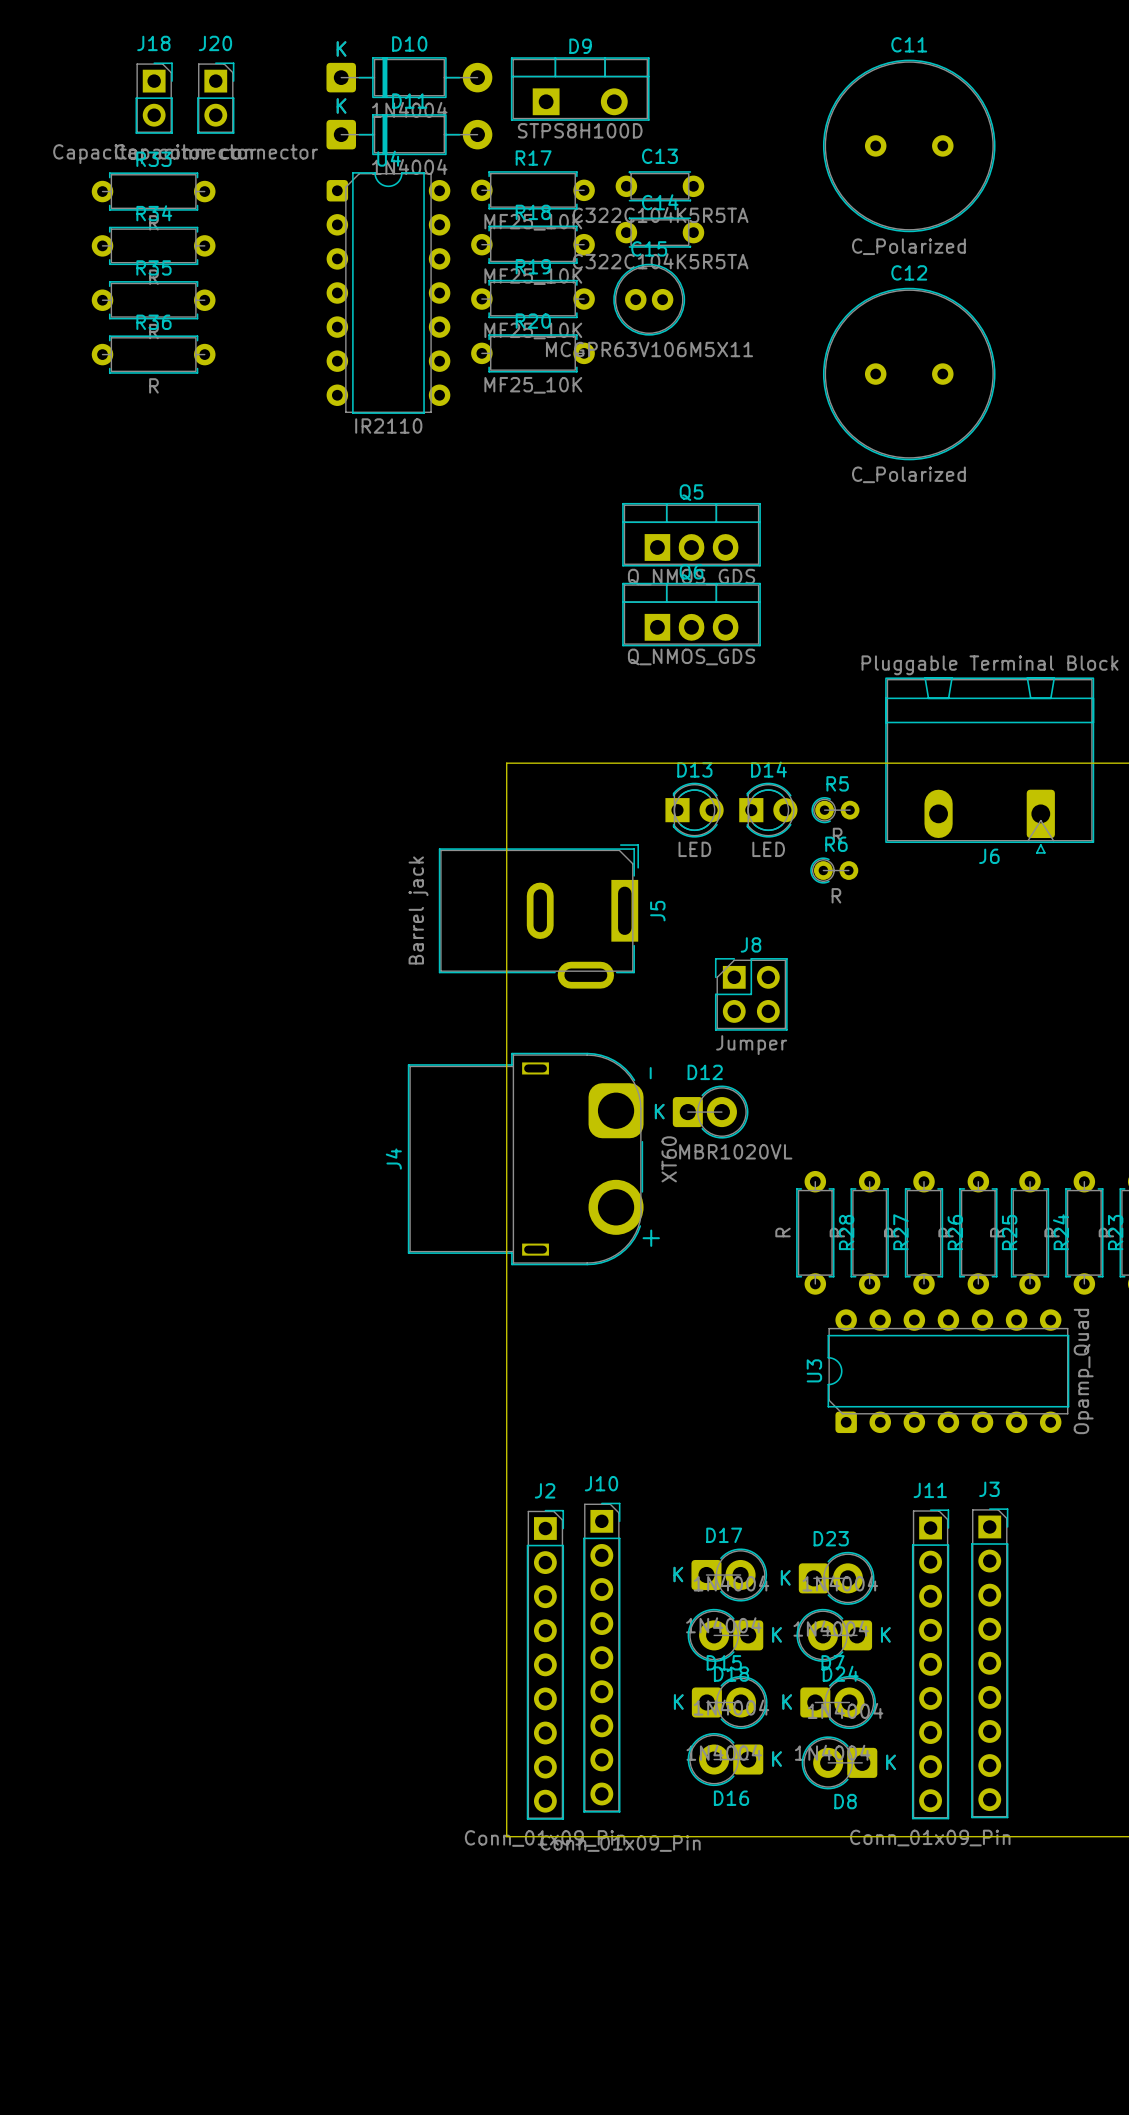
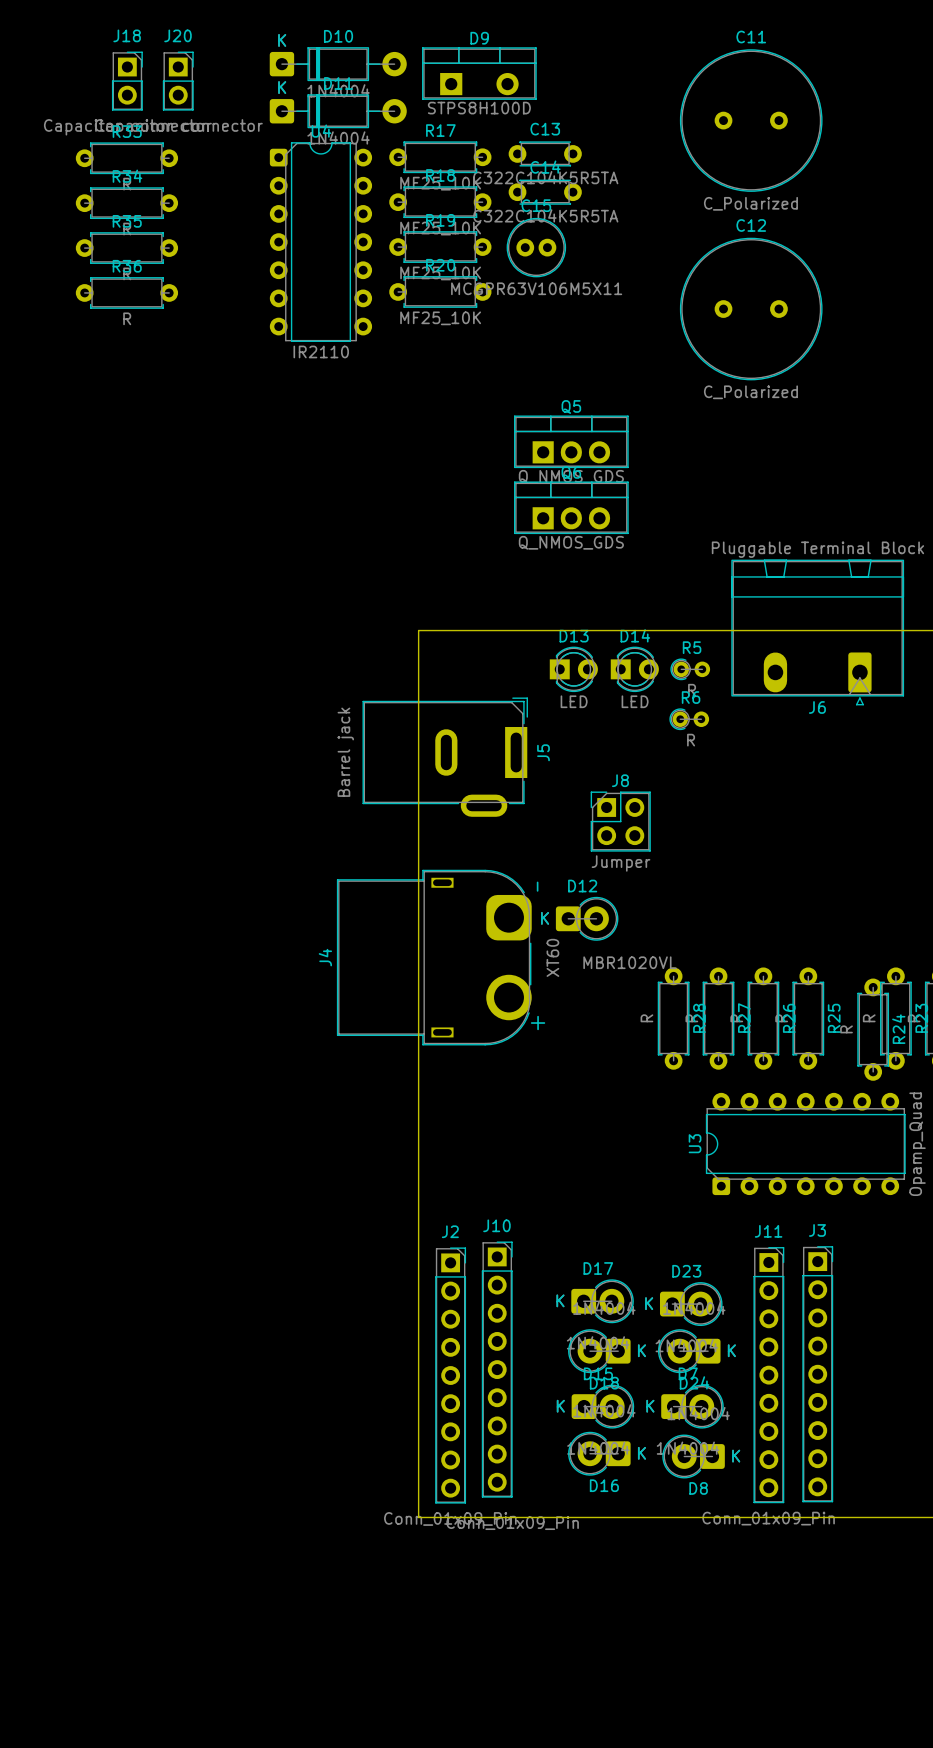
D12 value position: MBR1020VL (735, 1151) -> MBR1020VL (630, 962)
R24 position: (1030, 1232) -> (873, 1029)
U3 position: (948, 1371) -> (805, 1143)

